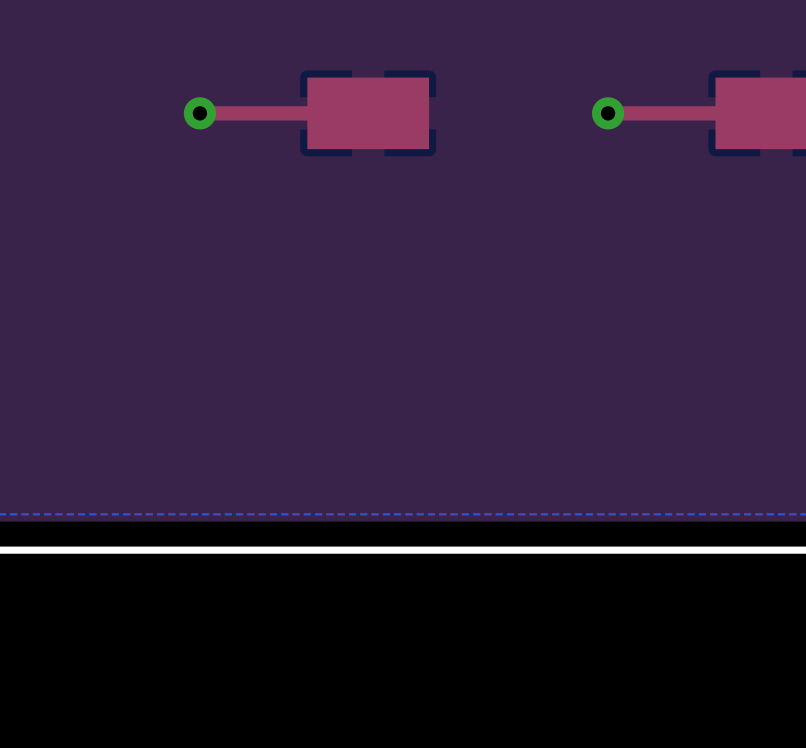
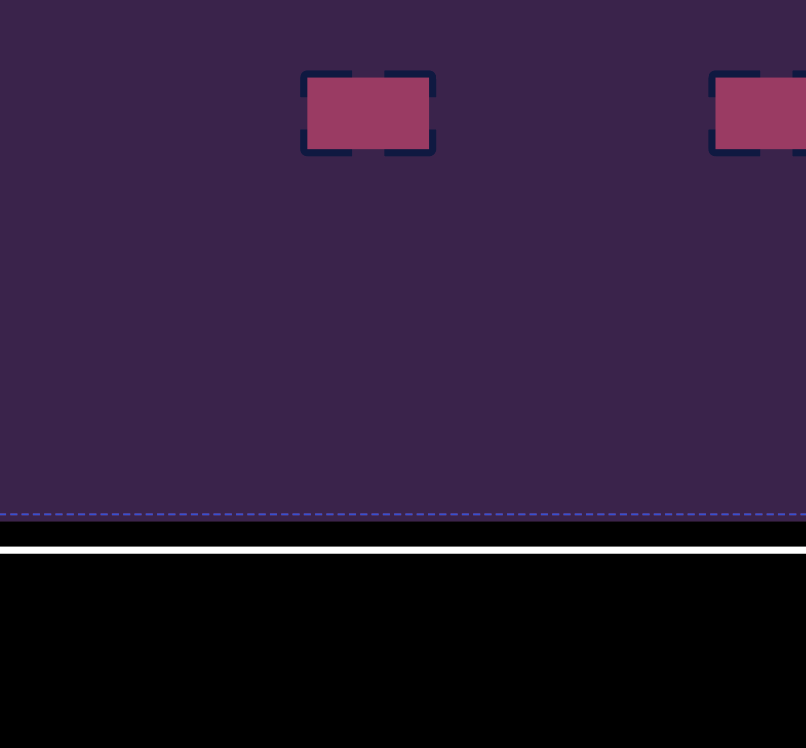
via: (199, 113) -> none
top track: (368, 113) (199, 113) -> none
via: (608, 113) -> none
top track: (776, 113) (608, 113) -> none

